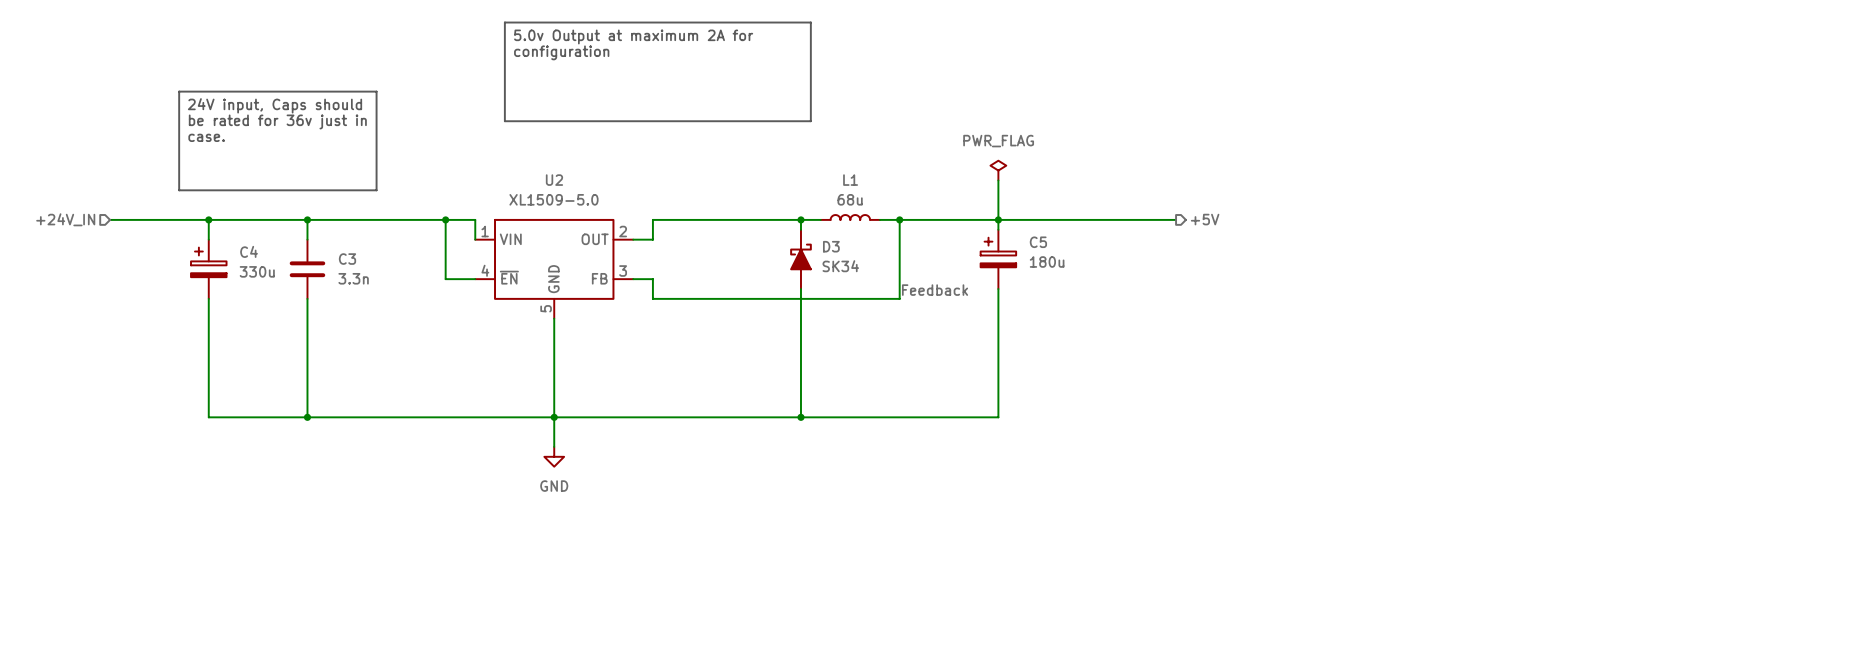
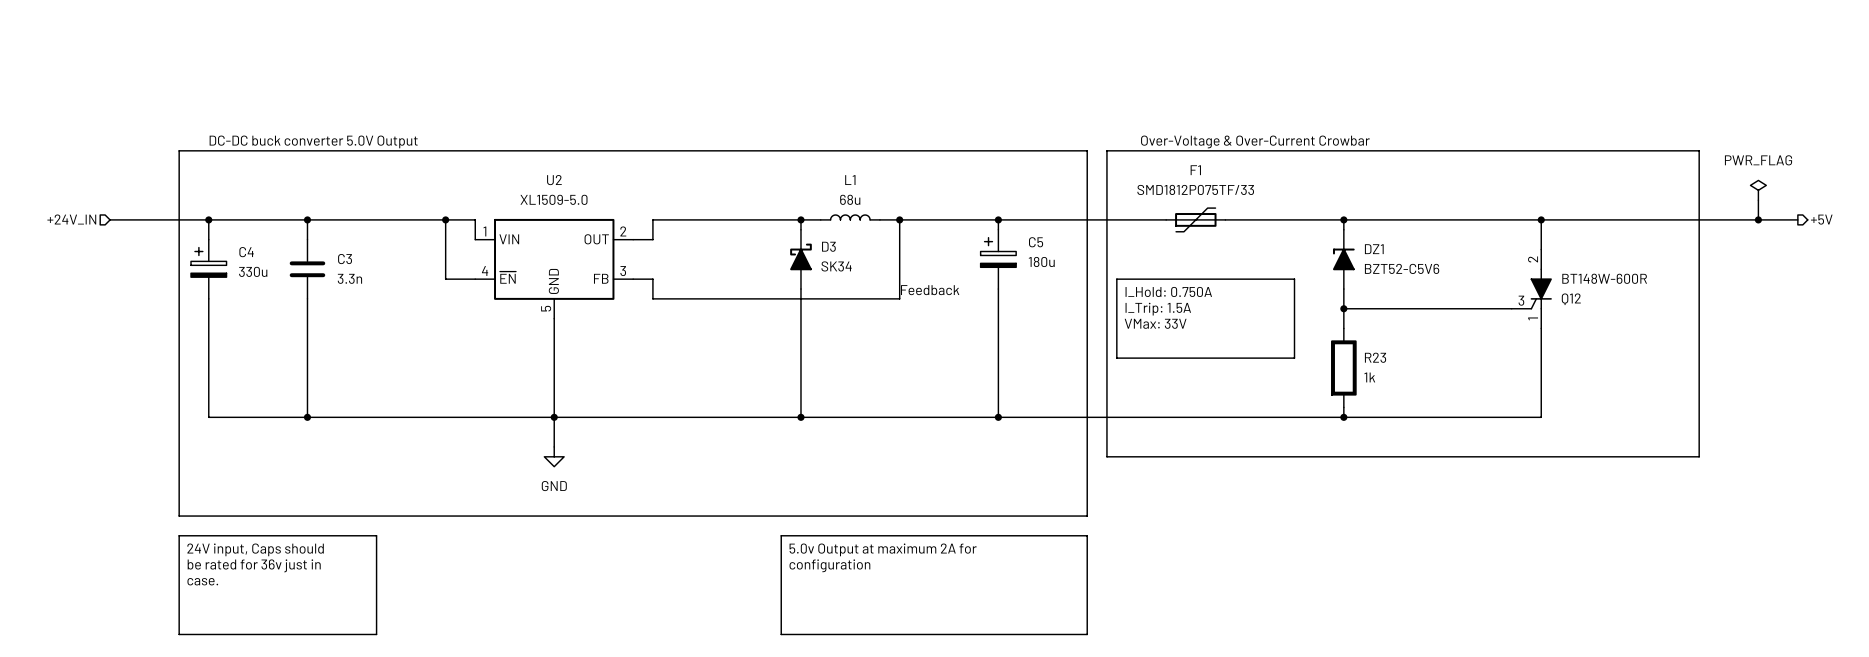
line: (504, 22) (810, 22) (810, 121) (504, 121) (504, 22) -> none
text: 5.0v Output at maximum 2A for (633, 36) -> none
text: configuration (561, 52) -> none
text: 24V input, Caps should (275, 105) -> none
text: be rated for 36v just in (277, 121) -> none
text: case. (206, 137) -> none
text: none -> DC-DC buck converter 5.0V Output (313, 141)
text: none -> Over-Voltage & Over-Current Crowbar (1255, 141)
line: (179, 150) (179, 91) (376, 91) (376, 190) (179, 190) -> (179, 150) (1087, 150) (1087, 516) (179, 516) (179, 190)
line: none -> (1106, 150) (1699, 150) (1699, 456) (1106, 456) (1106, 150)
power symbol: PWR_FLAG (998, 170) -> none
wire: (998, 180) (998, 219) -> none
power symbol: none -> PWR_FLAG (1758, 190)
wire: none -> (1758, 200) (1758, 219)
F1: none -> SMD1812P075TF/33 (1195, 219)
hierarchical label: +5V (1205, 219) -> none
wire: none -> (1225, 219) (1797, 219)
wire: none -> (1343, 219) (1343, 229)
junction: none -> (1343, 219)
wire: none -> (1541, 219) (1541, 249)
junction: none -> (1541, 219)
junction: none -> (1758, 219)
hierarchical label: none -> +5V (1821, 219)
DZ1: none -> BZT52-C5V6 (1343, 259)
line: none -> (1116, 279) (1294, 279) (1294, 358) (1116, 358) (1116, 279)
wire: none -> (1343, 289) (1343, 328)
Q12: none -> BT148W-600R (1531, 289)
text: none -> I_Hold: 0.750A (1168, 291)
wire: none -> (1343, 308) (1511, 308)
junction: none -> (1343, 308)
text: none -> I_Trip: 1.5A (1158, 309)
text: none -> VMax: 33V (1155, 323)
wire: none -> (1541, 328) (1541, 417) (998, 417)
R23: none -> 1k (1343, 367)
wire: none -> (1343, 407) (1343, 417)
junction: none -> (998, 417)
junction: none -> (1343, 417)
line: none -> (179, 535) (179, 634) (376, 634) (376, 535) (179, 535)
line: none -> (781, 535) (1087, 535) (1087, 634) (781, 634) (781, 535)
text: none -> 24V input, Caps should (255, 549)
text: none -> 5.0v Output at maximum 2A for (883, 549)
text: none -> be rated for 36v just in (254, 565)
text: none -> configuration (829, 565)
text: none -> case. (202, 581)

